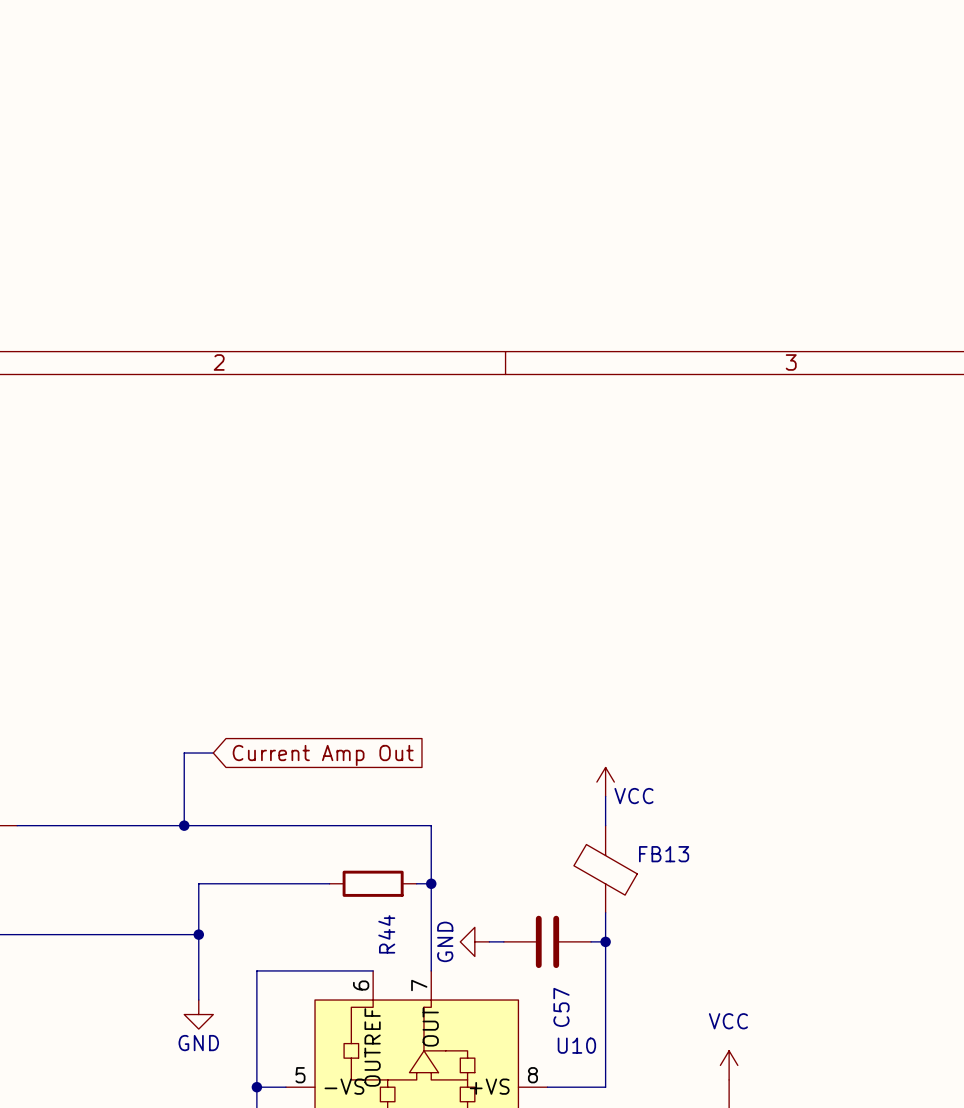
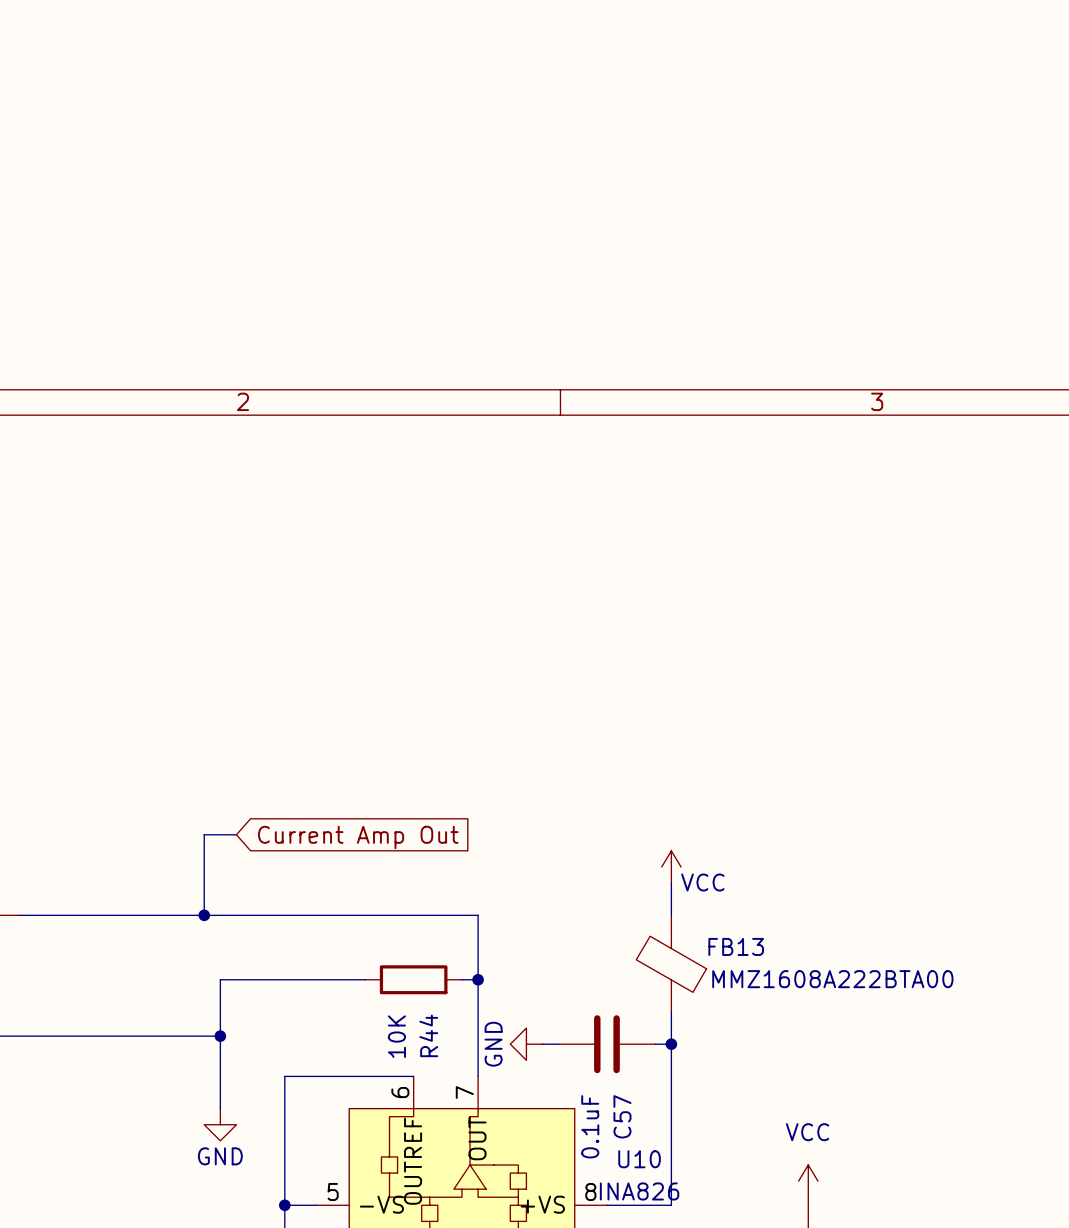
FB13 value: none -> MMZ1608A222BTA00 (832, 979)
R44 value: none -> 10K (396, 1036)
C57 value: none -> 0.1uF (590, 1126)
U10 value: none -> INA826 (639, 1191)

